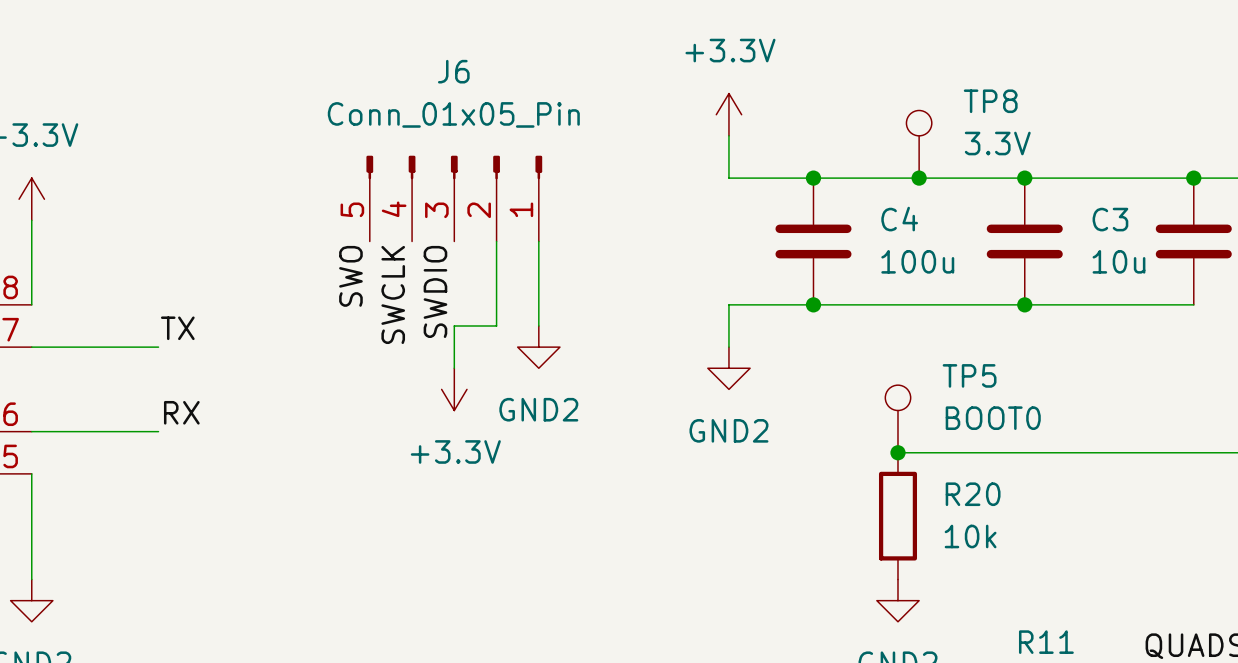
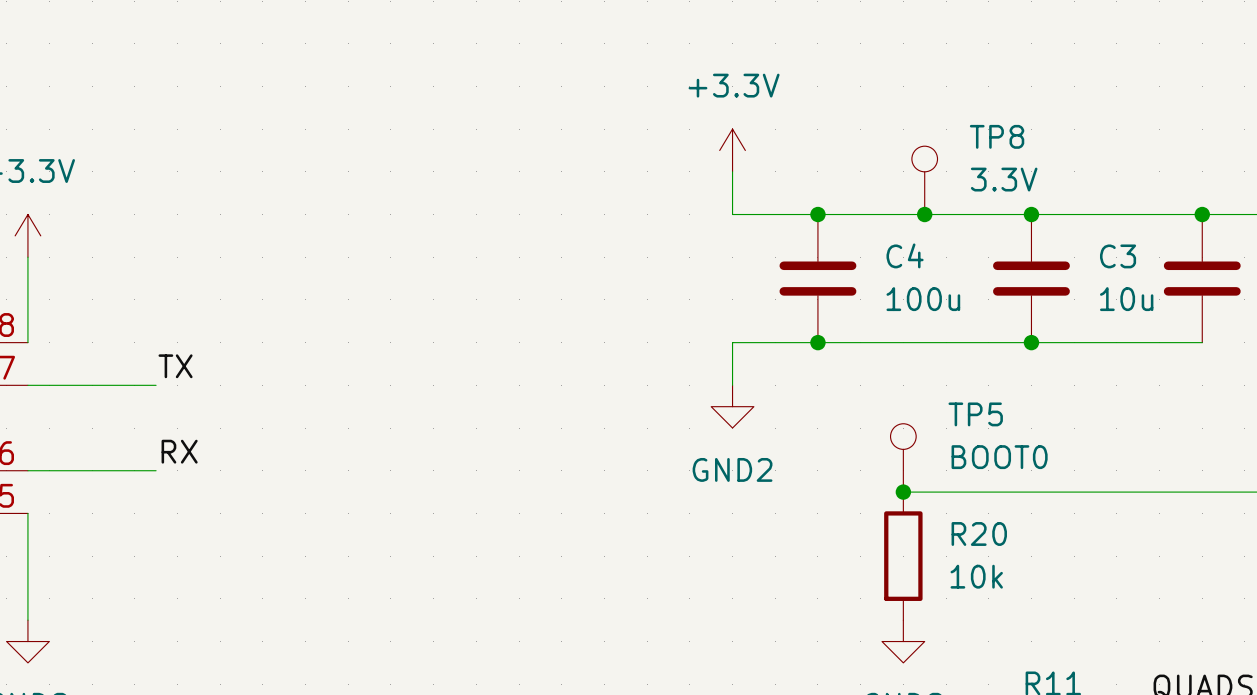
J6: Conn_01x05_Pin (454, 198) -> none
wire: (496, 241) (496, 326) (454, 326) (454, 368) -> none
wire: (538, 241) (538, 326) -> none
label: SWO (350, 276) -> none
label: SWDIO (435, 291) -> none
label: SWCLK (393, 294) -> none
power symbol: GND2 (538, 347) -> none
power symbol: +3.3V (454, 389) -> none

